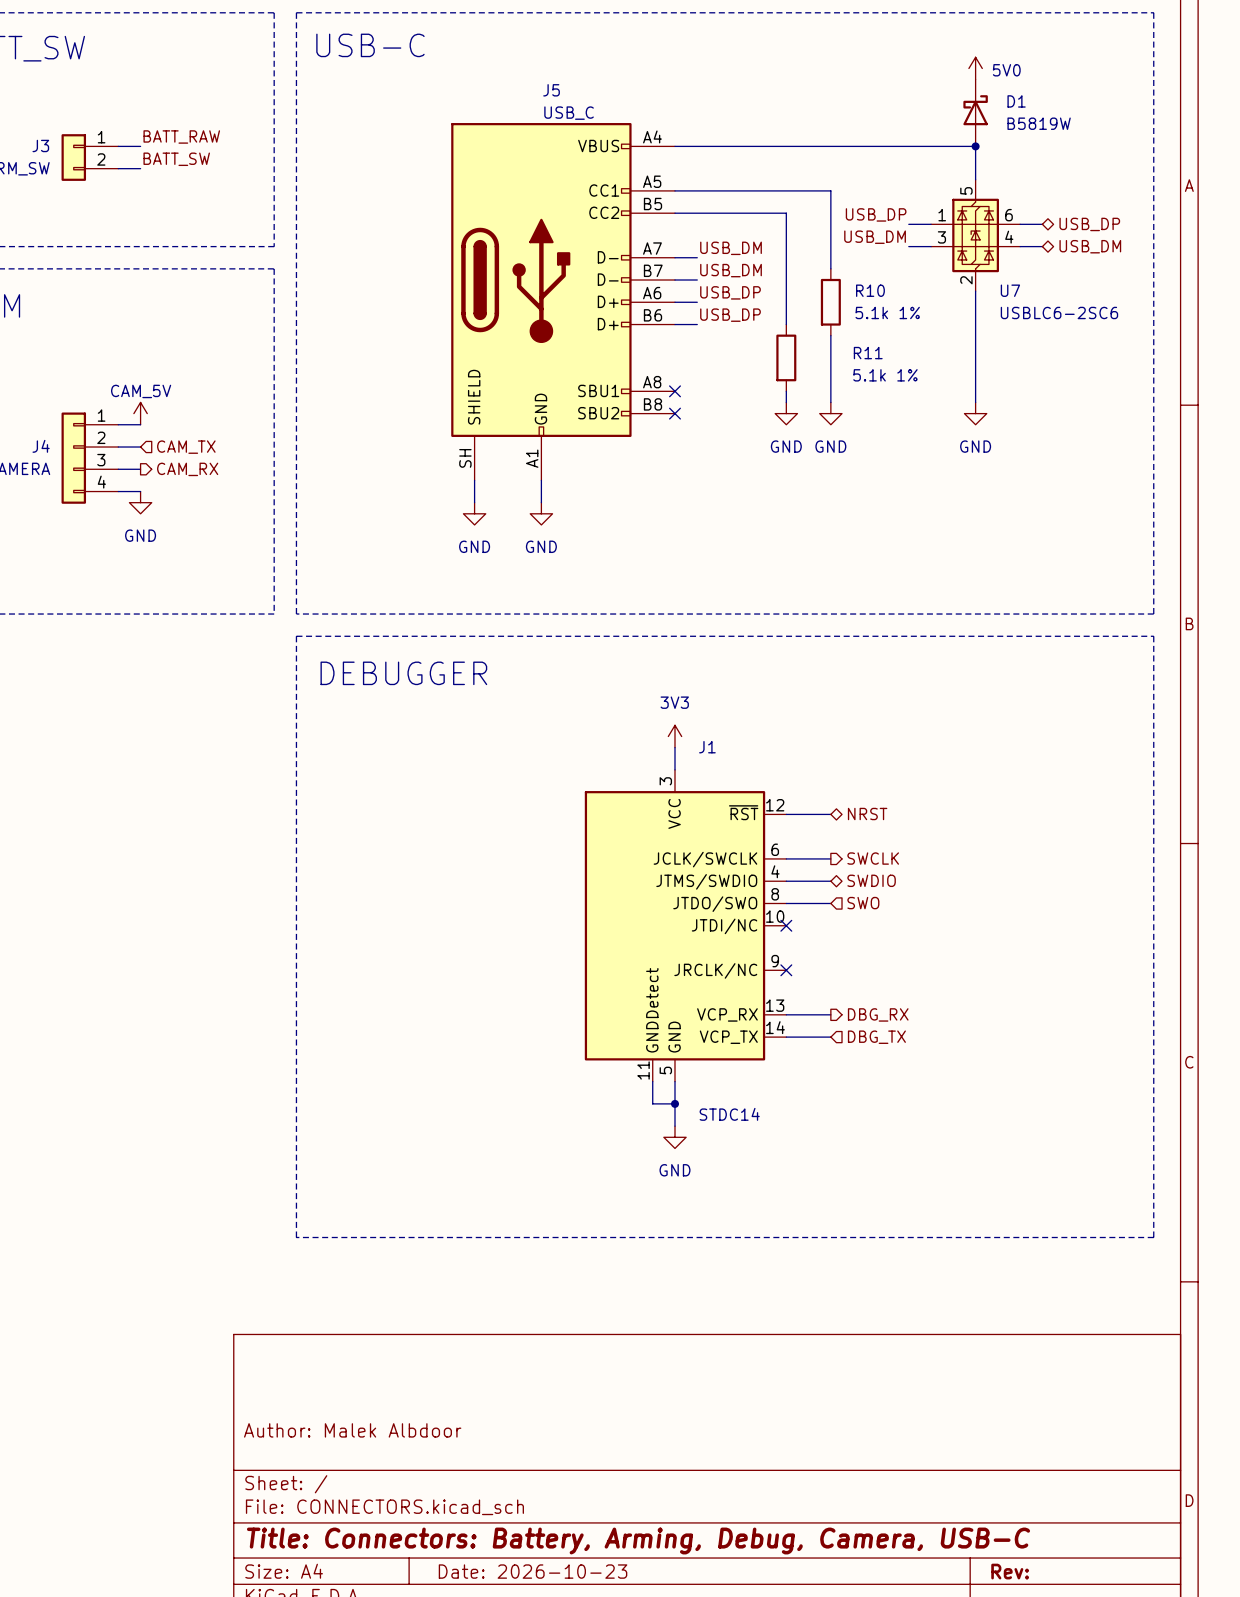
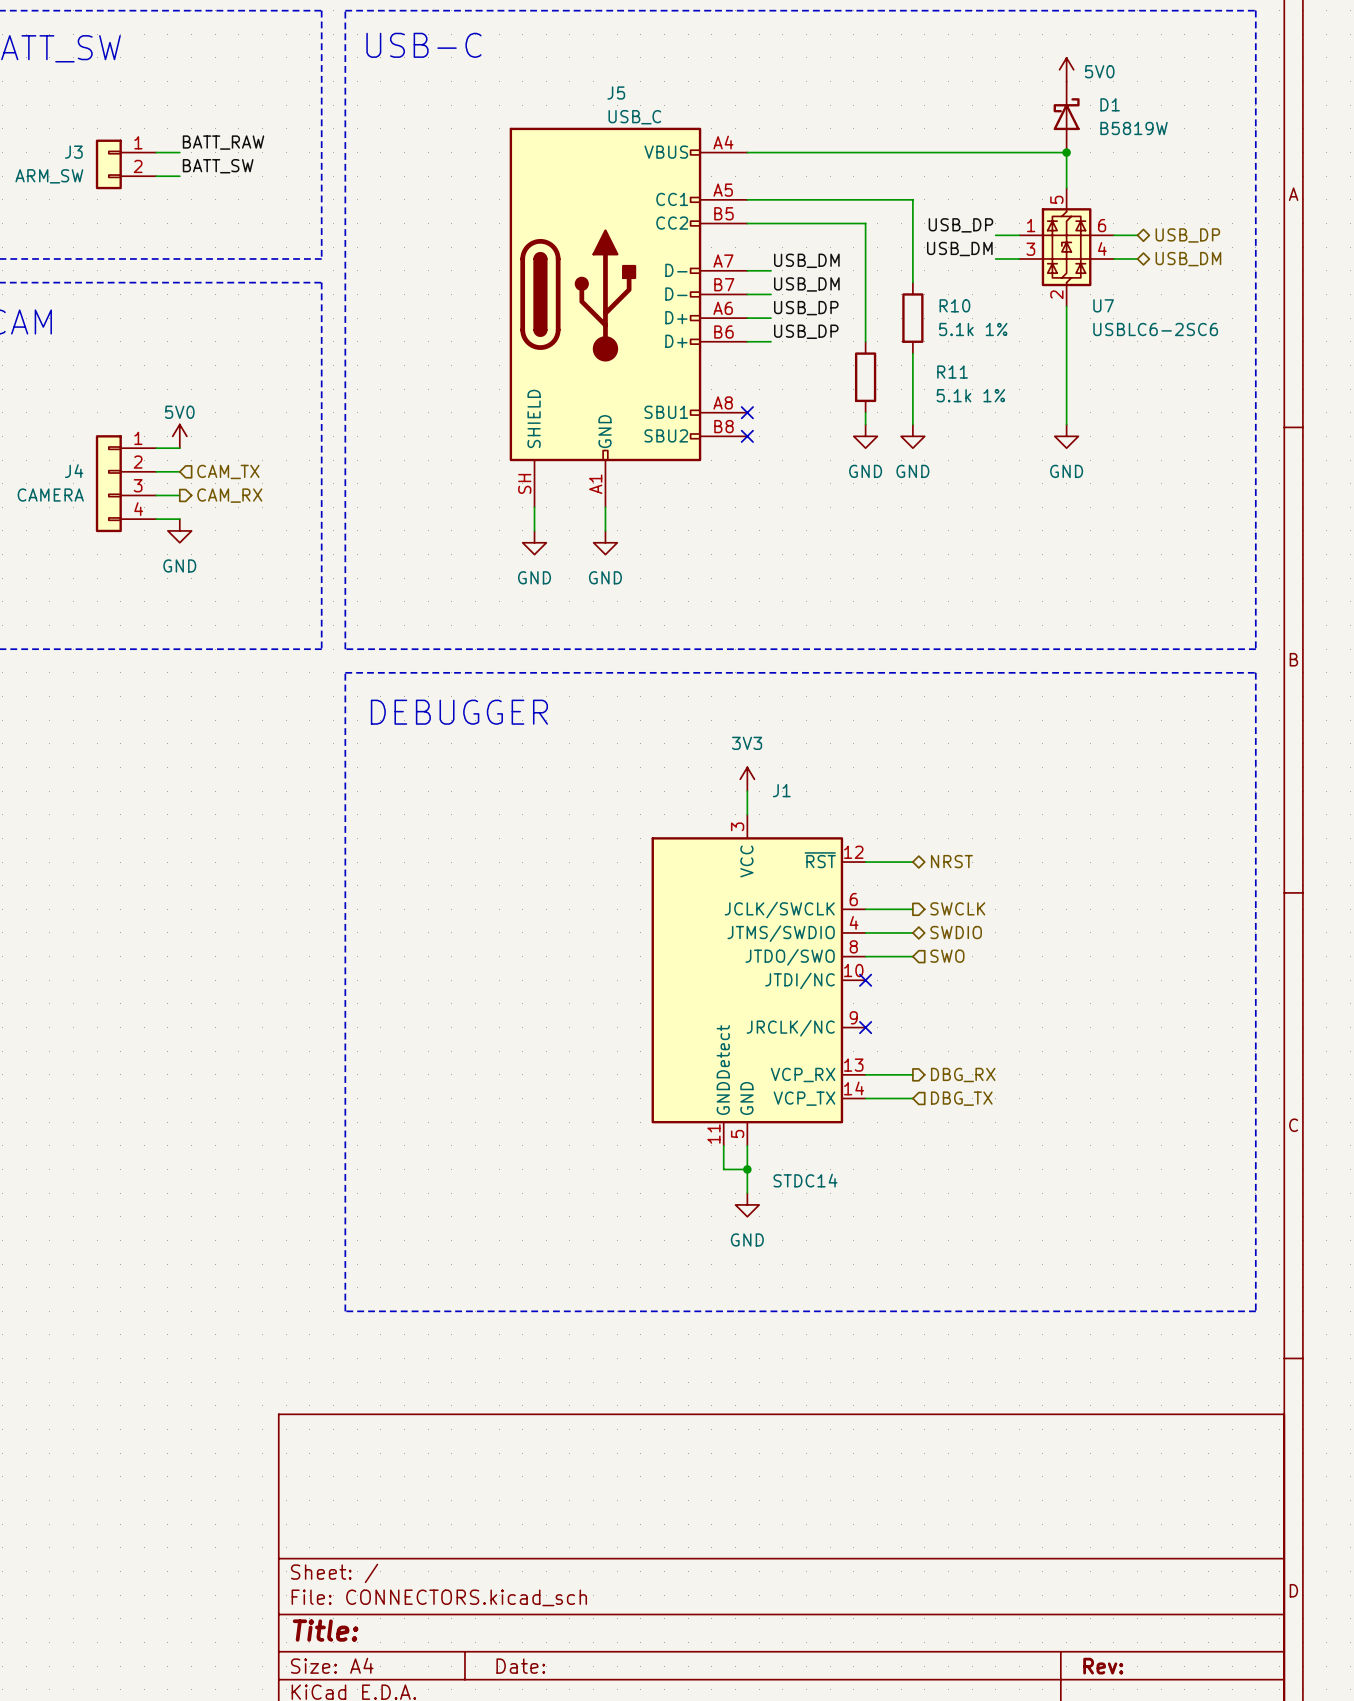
power symbol: CAM_5V (140, 413) -> 5V0 (179, 436)
title block: Author: Malek Albdoor (352, 1430) -> none
title block: Title: Connectors: Battery, Arming, Debug, Camera, USB-C (638, 1541) -> Title: (325, 1630)
title block: Date: 2026-10-23 (533, 1571) -> Date: (520, 1666)

